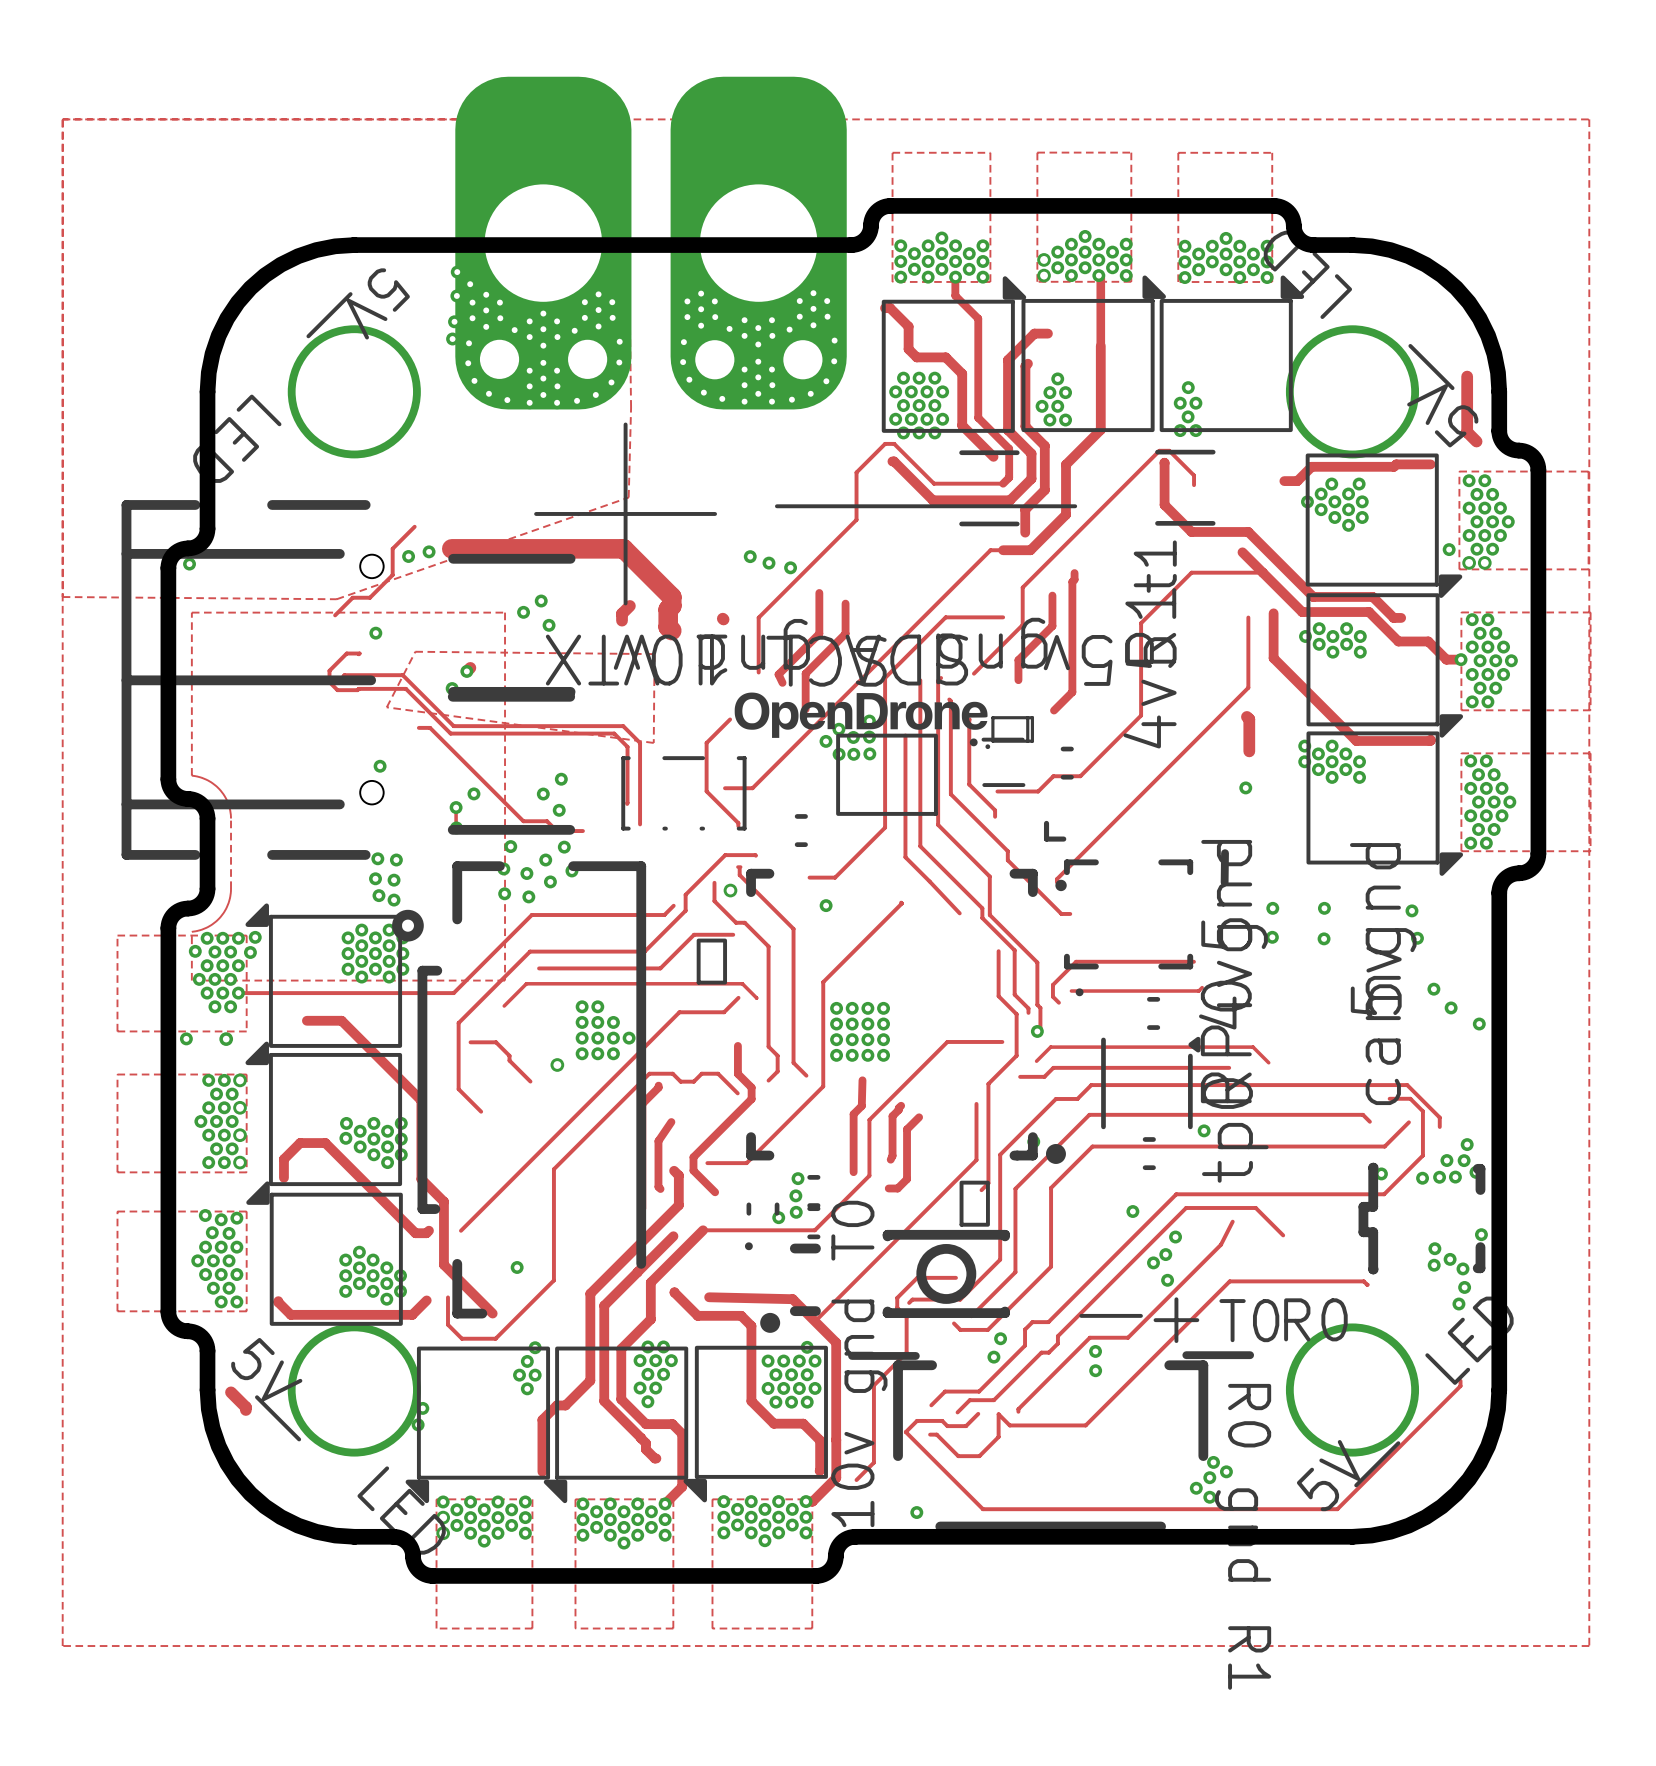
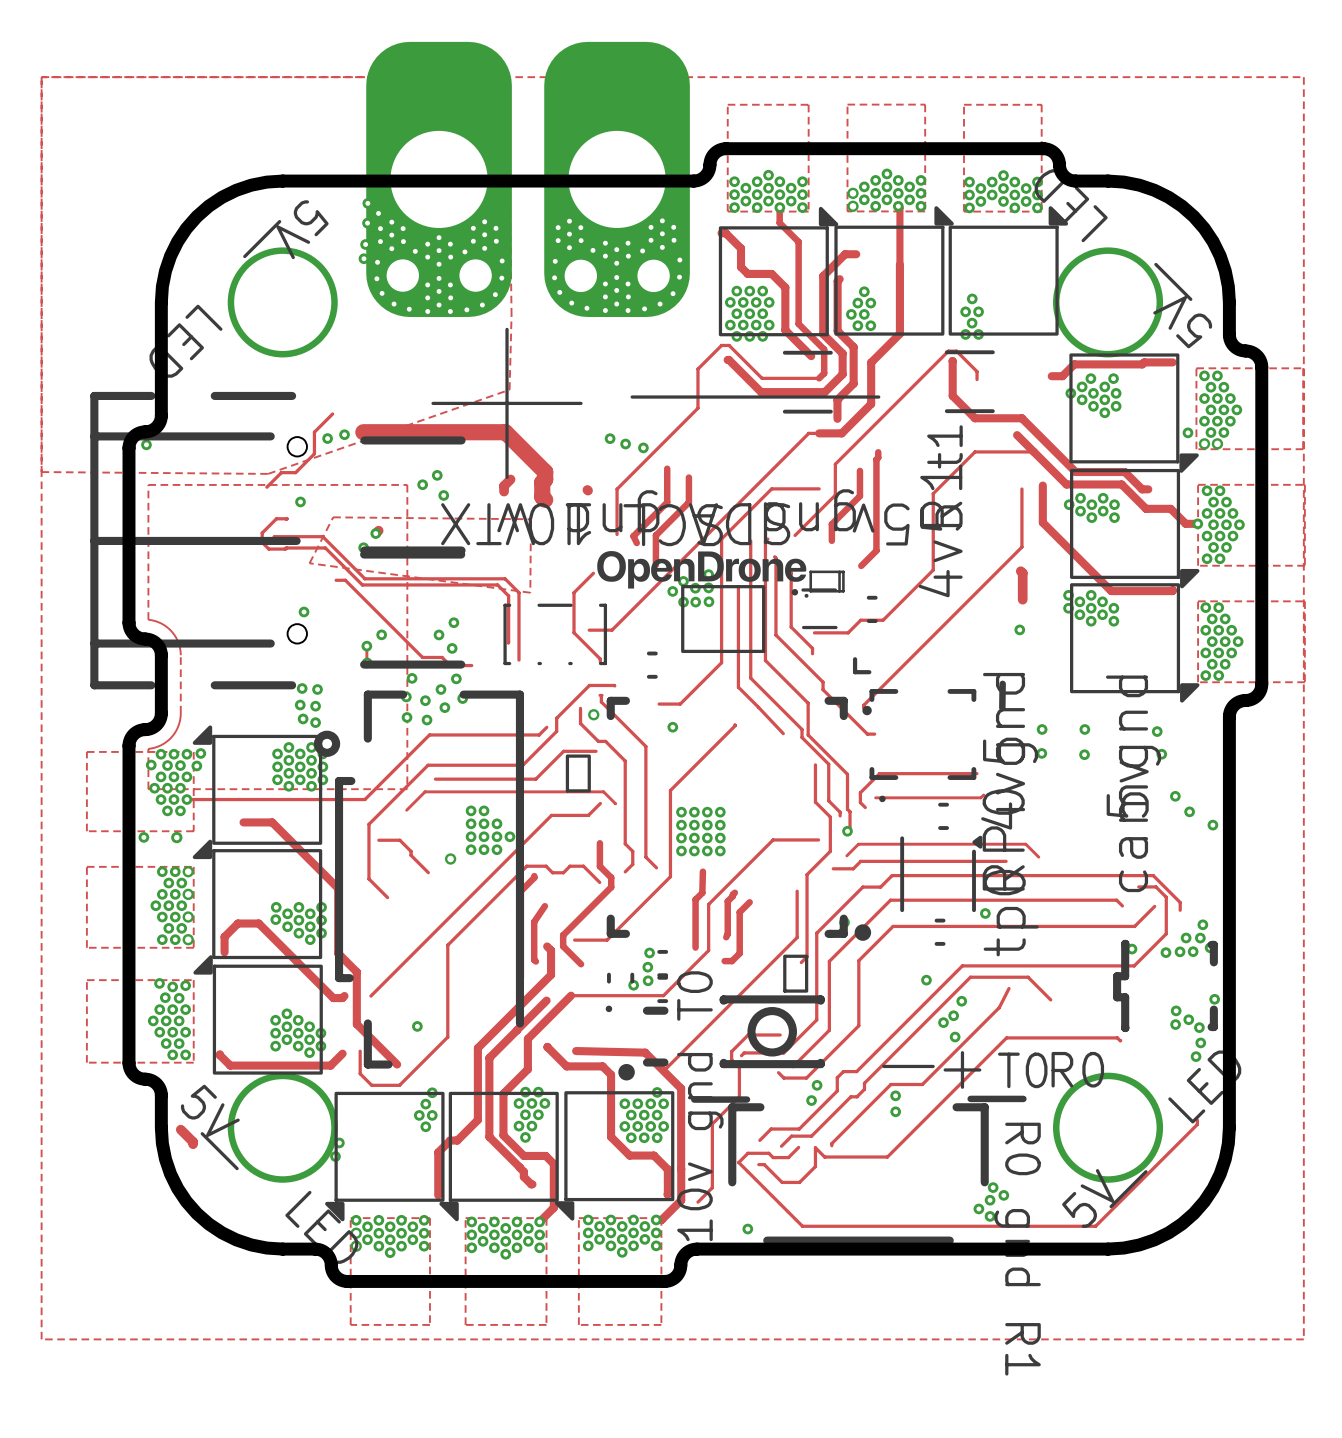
track: (1467, 376) (1467, 432) (1476, 441) -> none

